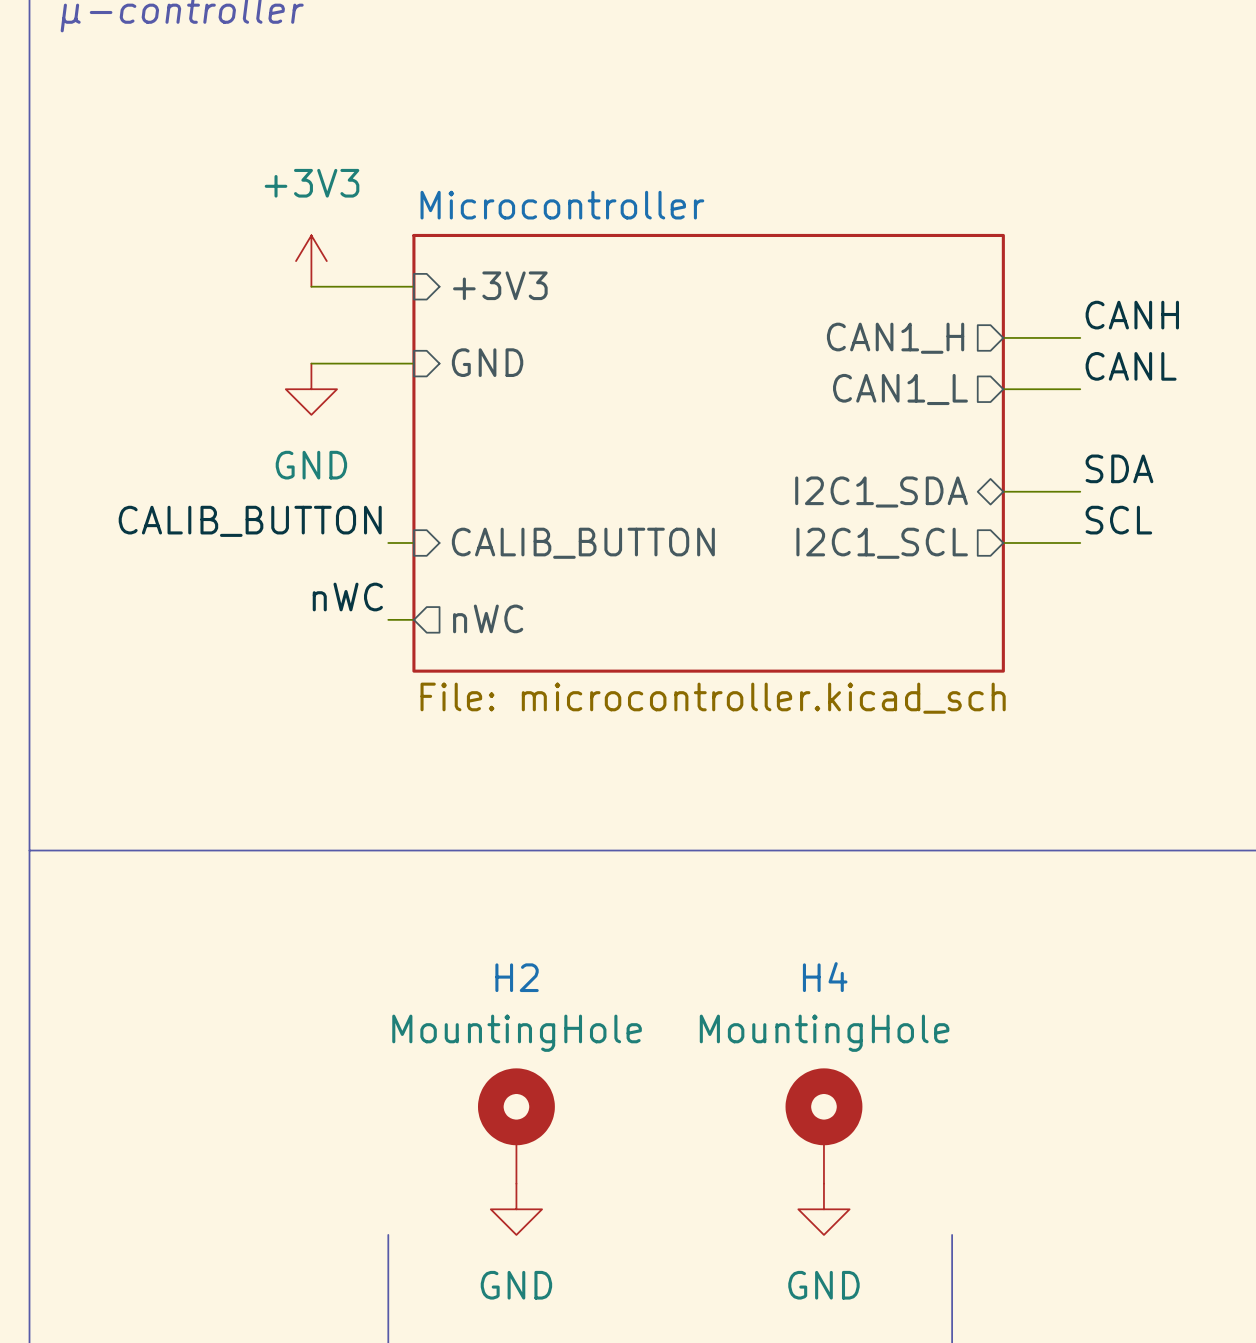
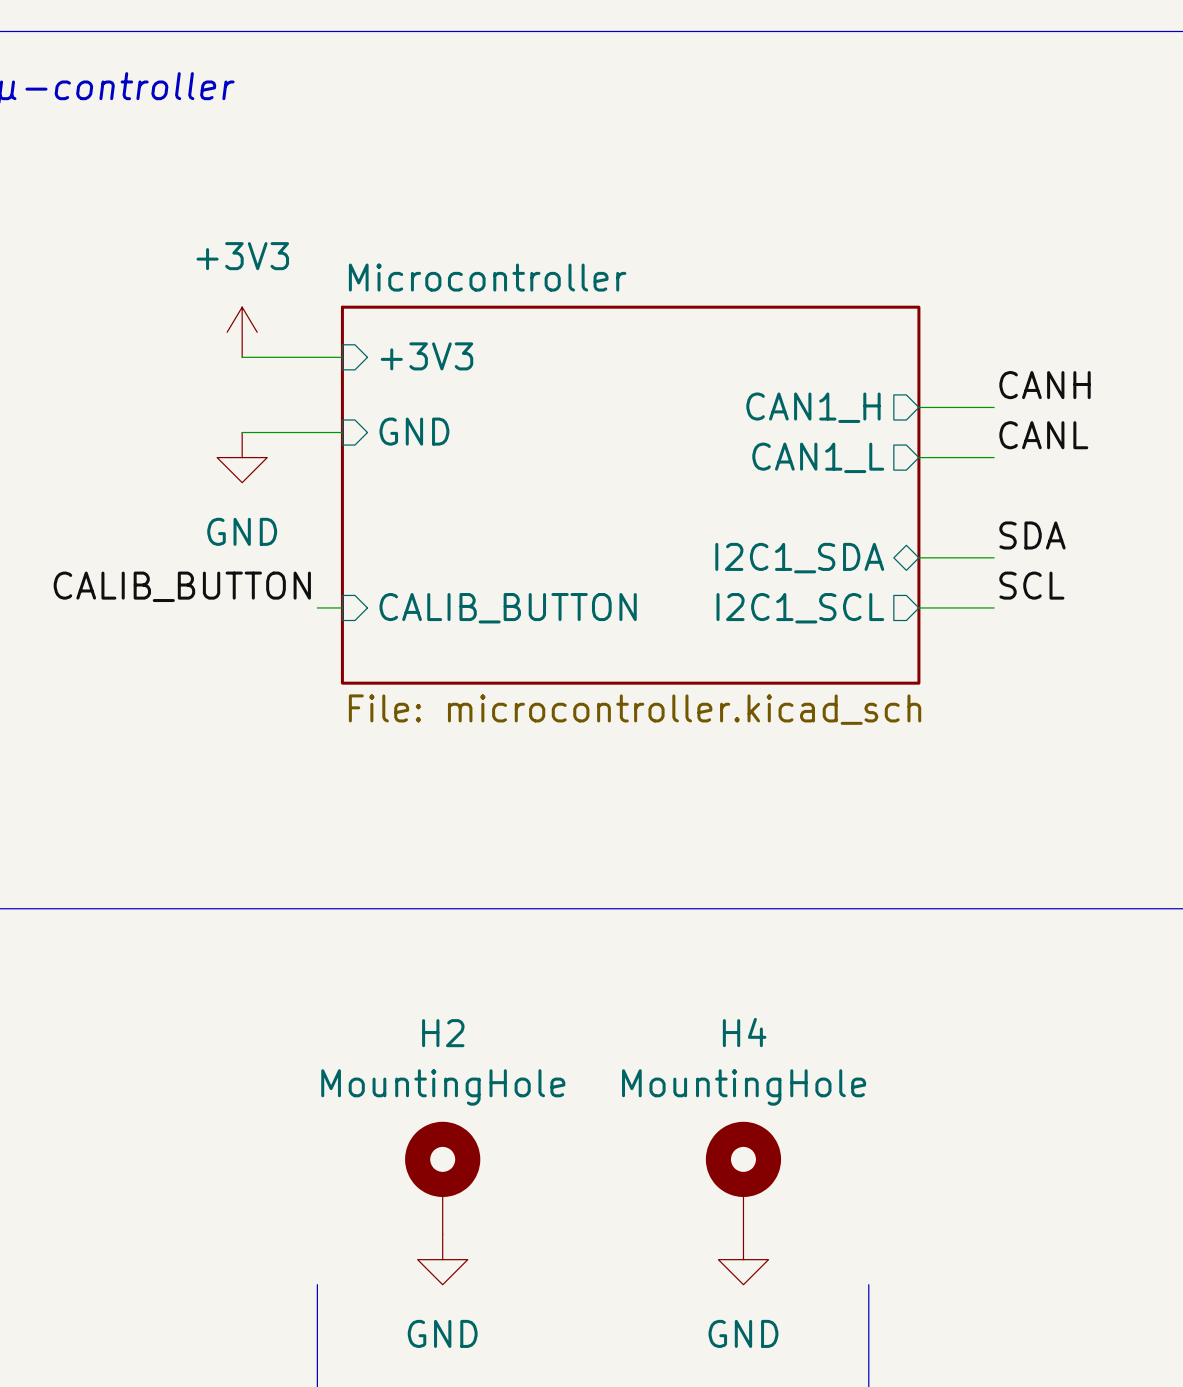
sheet Microcontroller: none -> File: microcontroller.kicad_sch (630, 495)
sheet Microcontroller: File: microcontroller.kicad_sch (708, 453) -> none
label: nWC (347, 597) -> none
sheet pin: nWC (488, 618) -> none
wire: (388, 619) (413, 619) -> none

